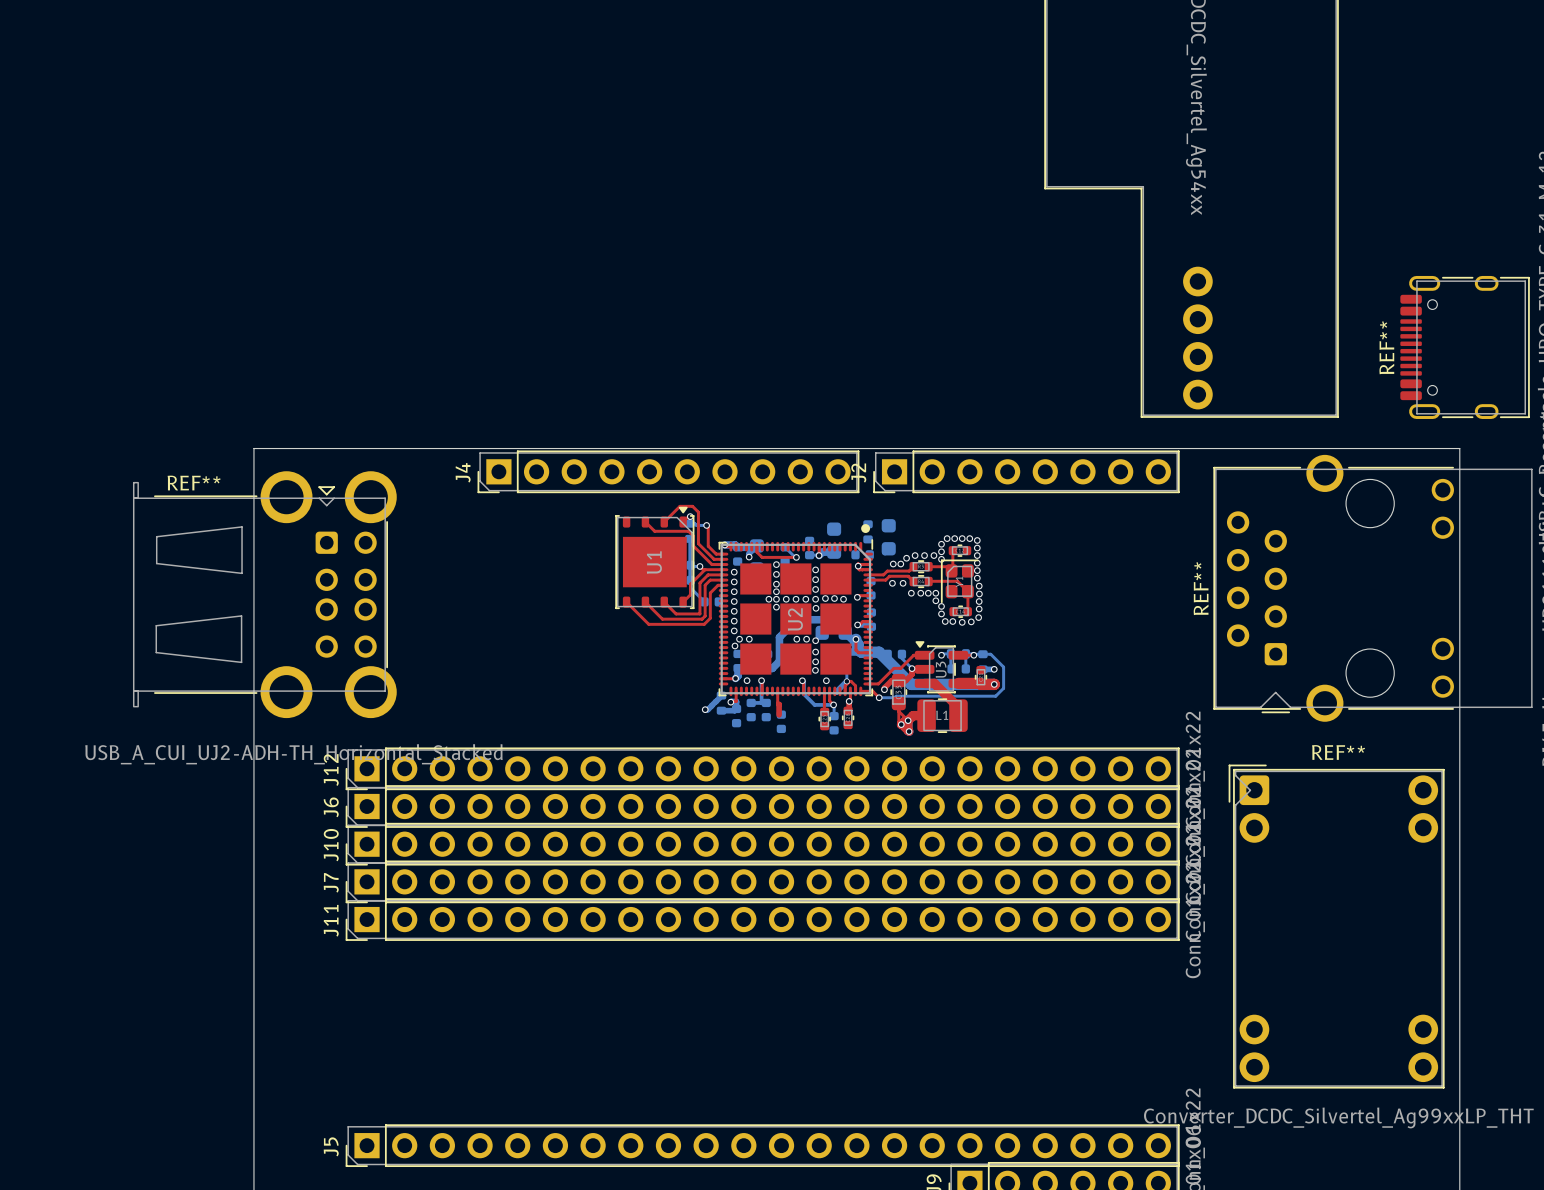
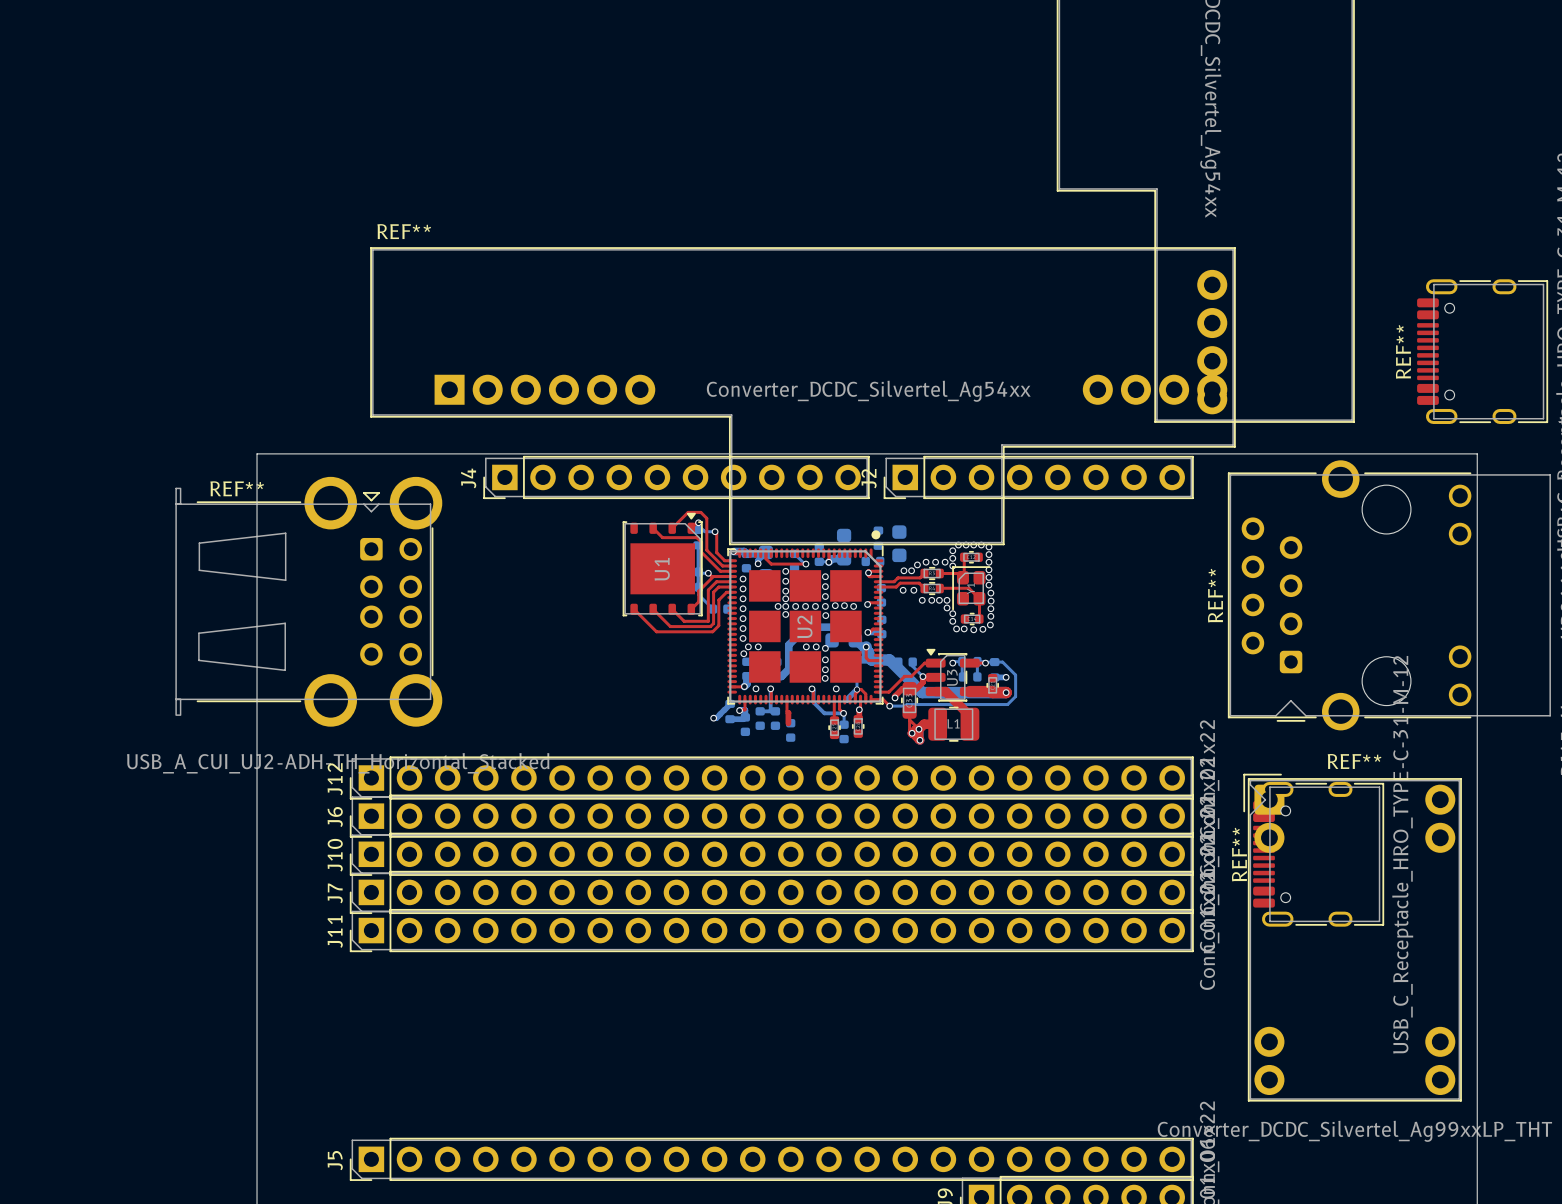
REF**: none -> Converter_DCDC_Silvertel_Ag54xx (802, 396)
REF** position: (264, 594) -> (308, 601)
REF**: none -> USB_C_Receptacle_HRO_TYPE-C-31-M-12 (1318, 854)

